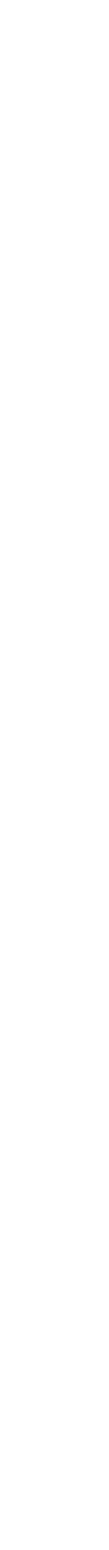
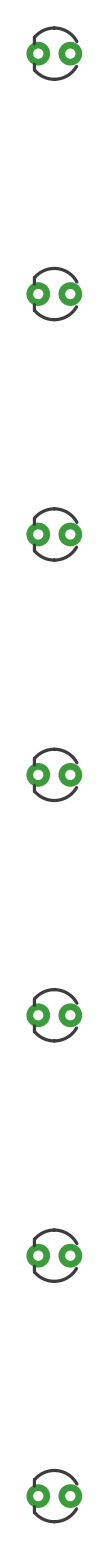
part: none -> (54, 53)
part: none -> (54, 294)
part: none -> (54, 534)
part: none -> (54, 774)
part: none -> (54, 1015)
part: none -> (54, 1255)
part: none -> (54, 1496)

